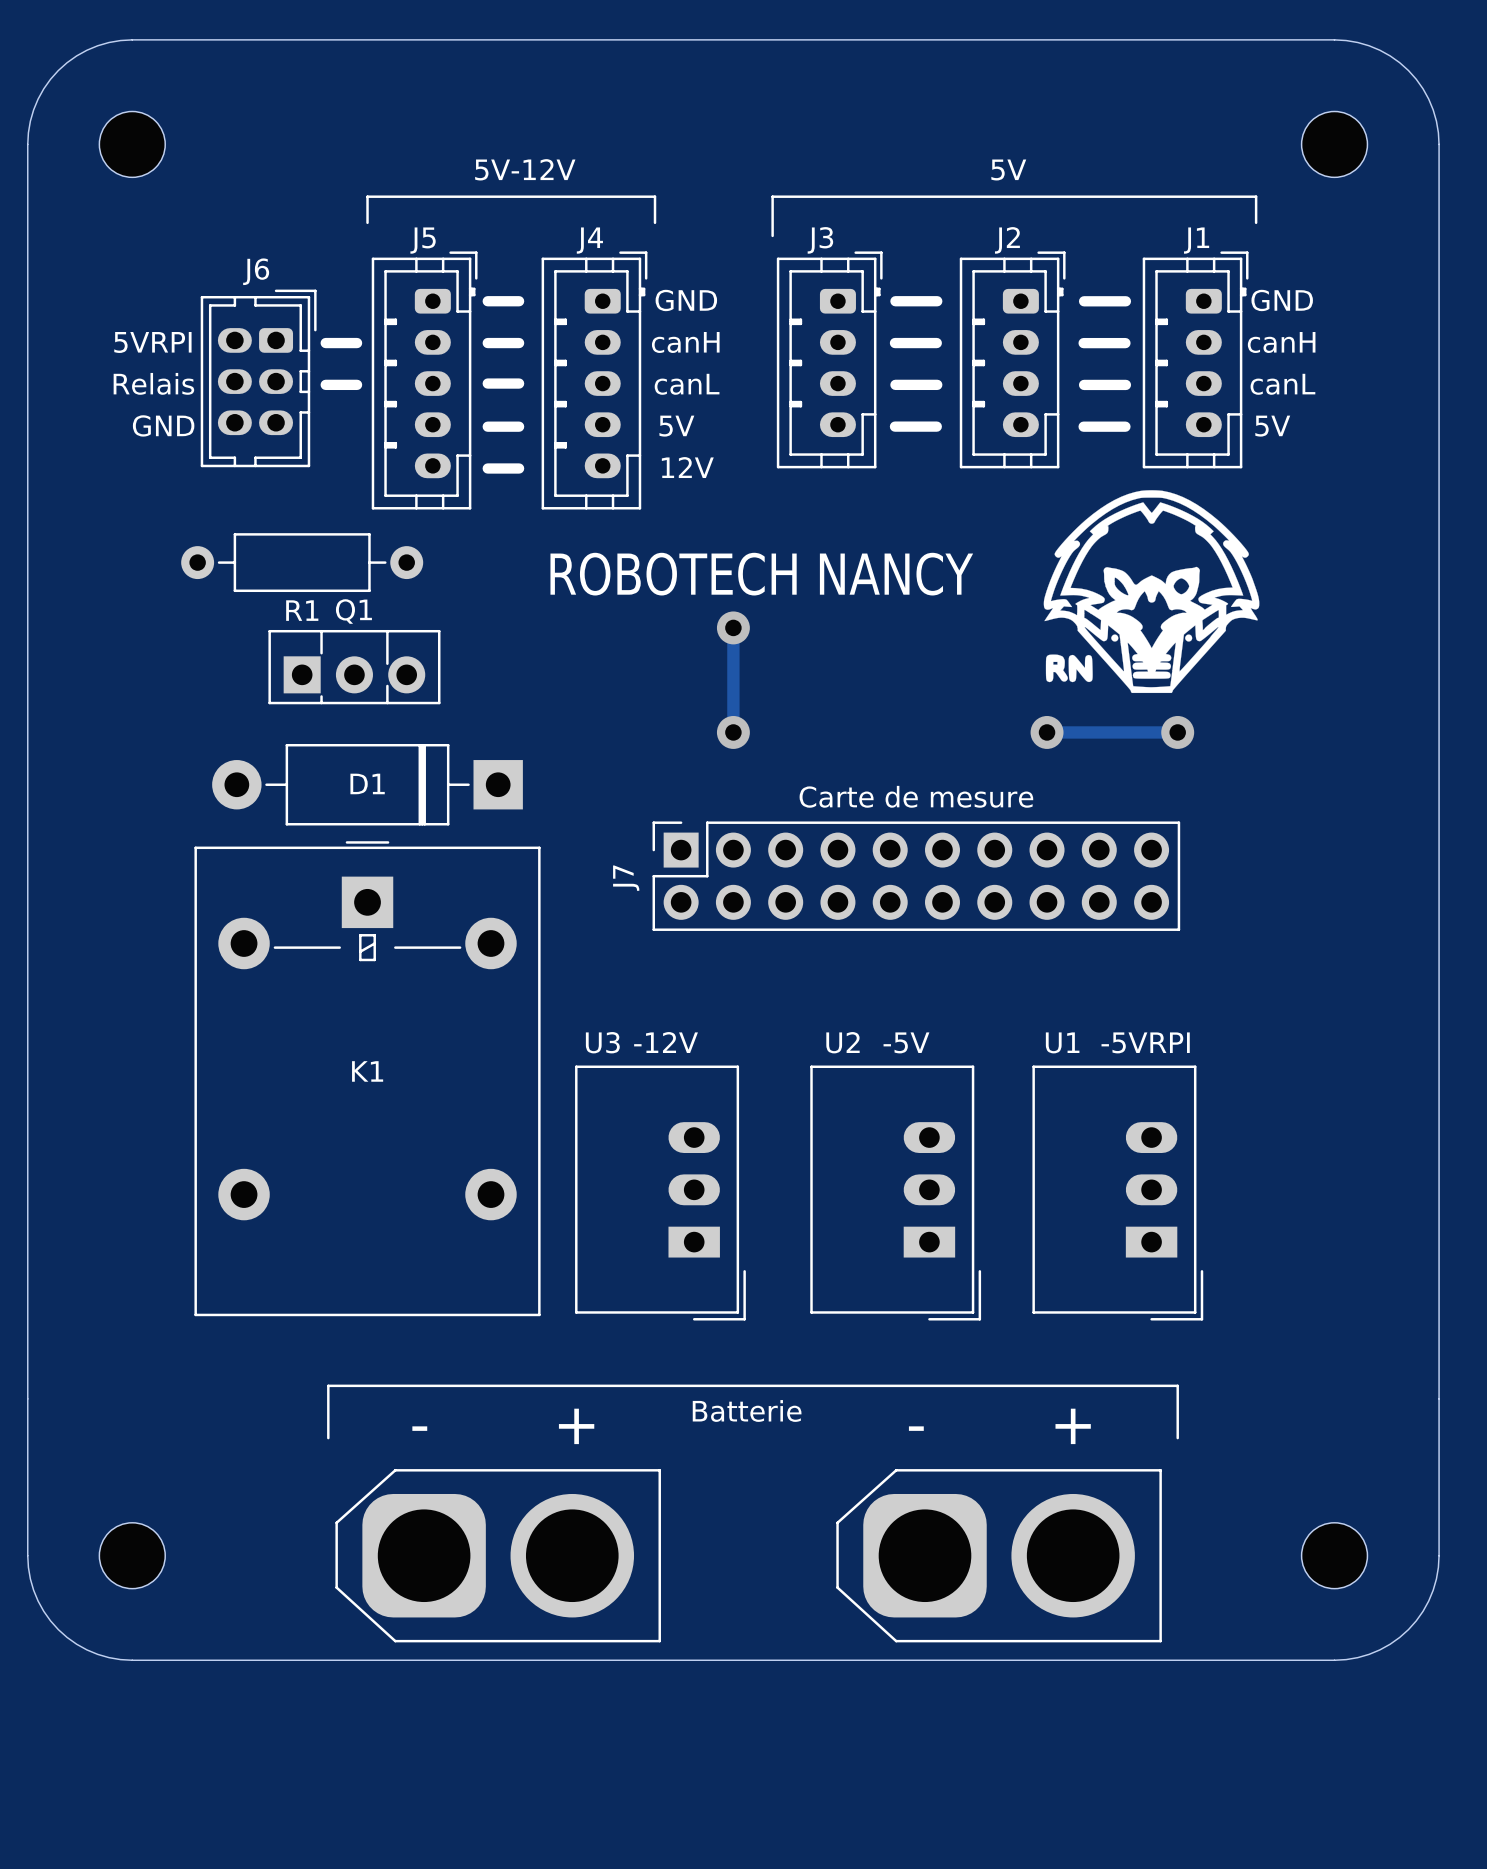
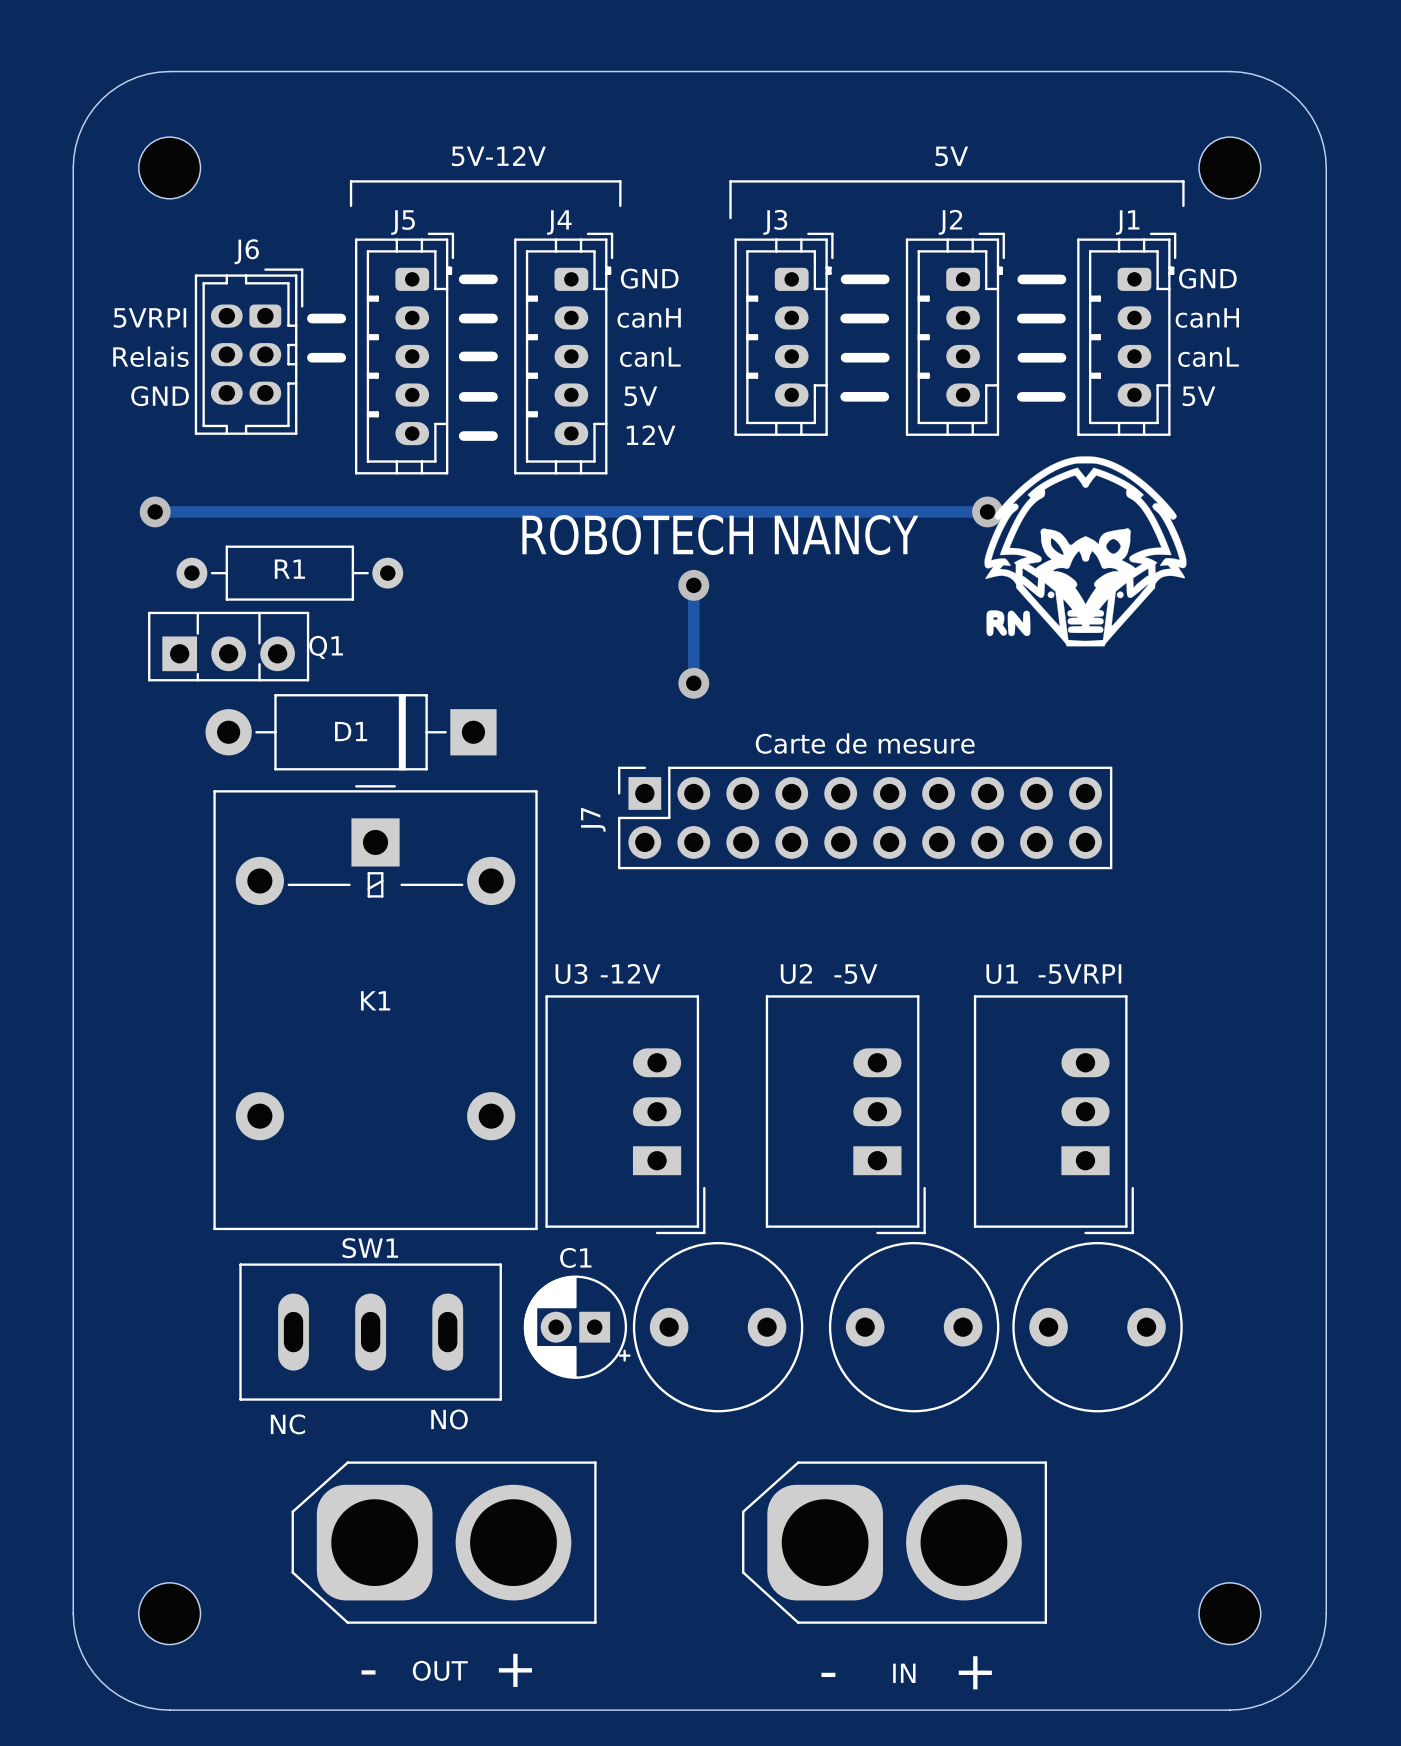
board edge: (132, 39) (1334, 39) (1357, 42) (1379, 50) (1399, 62) (1416, 79) (1433, 109) (1439, 144) (1439, 1555) (1436, 1578) (1428, 1601) (1416, 1620) (1399, 1637) (1369, 1654) (1334, 1660) (132, 1660) (109, 1657) (86, 1649) (67, 1637) (50, 1620) (33, 1590) (27, 1555) (27, 144) (30, 121) (38, 99) (58, 70) (86, 50) (109, 42) (132, 39) -> (169, 71) (137, 76) (118, 86) (101, 99) (88, 116) (78, 136) (73, 167) (73, 1613) (75, 1635) (88, 1664) (109, 1689) (127, 1700) (148, 1707) (169, 1710) (1229, 1710) (1261, 1704) (1281, 1695) (1305, 1673) (1316, 1655) (1323, 1635) (1326, 1613) (1326, 167) (1323, 146) (1311, 116) (1298, 99) (1281, 86) (1251, 73) (1229, 71) (169, 71)
part position: (132, 144) -> (169, 167)
part position: (1334, 144) -> (1229, 167)
track: none -> (155, 511) (987, 511)
via: none -> (155, 511)
via: none -> (987, 511)
R1 position: (302, 562) -> (289, 573)
Q1 name position: Q1 (353, 611) -> Q1 (326, 647)
Q1 position: (354, 667) -> (228, 646)
track: (1047, 732) (1177, 732) -> none
via: (1047, 732) -> none
via: (1177, 732) -> none
K1 position: (367, 1078) -> (375, 1007)
text: Batterie (747, 1410) -> none
C1: none -> (577, 1327)
part: none -> (718, 1327)
part: none -> (914, 1327)
part: none -> (1097, 1327)
SW1: none -> (370, 1332)
text: + (576, 1426) -> none
text: + (1073, 1426) -> none
text: - (419, 1428) -> none
text: - (916, 1428) -> none
line: (328, 1438) (328, 1385) (1177, 1385) (1177, 1438) -> none
text: none -> NO (449, 1419)
text: none -> NC (287, 1424)
part position: (132, 1555) -> (169, 1613)
part position: (498, 1555) -> (444, 1542)
part position: (999, 1555) -> (894, 1542)
part position: (1334, 1555) -> (1229, 1613)
text: none -> OUT (440, 1670)
text: none -> + (515, 1670)
text: none -> - (368, 1672)
text: none -> + (975, 1672)
text: none -> IN (904, 1673)
text: none -> - (828, 1674)

